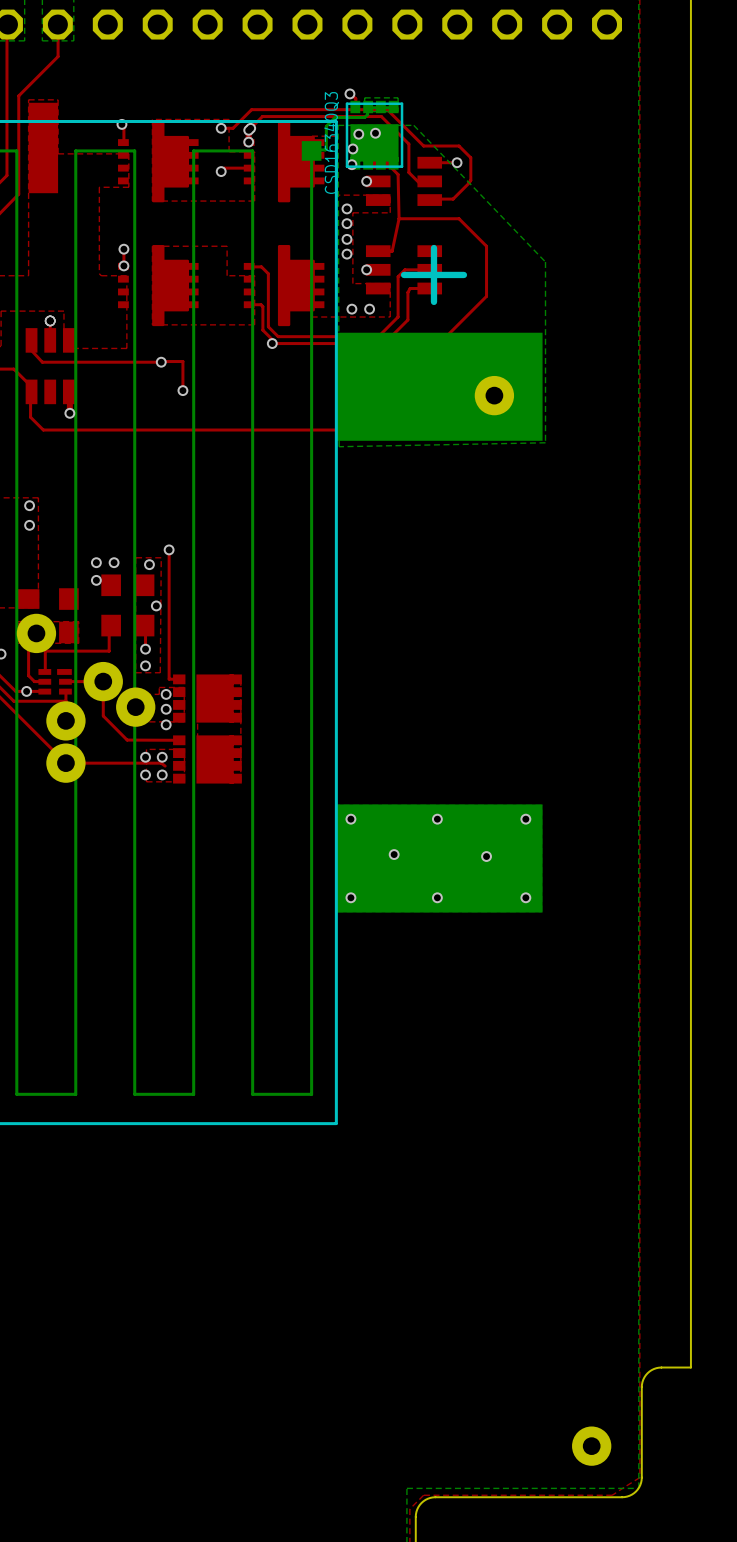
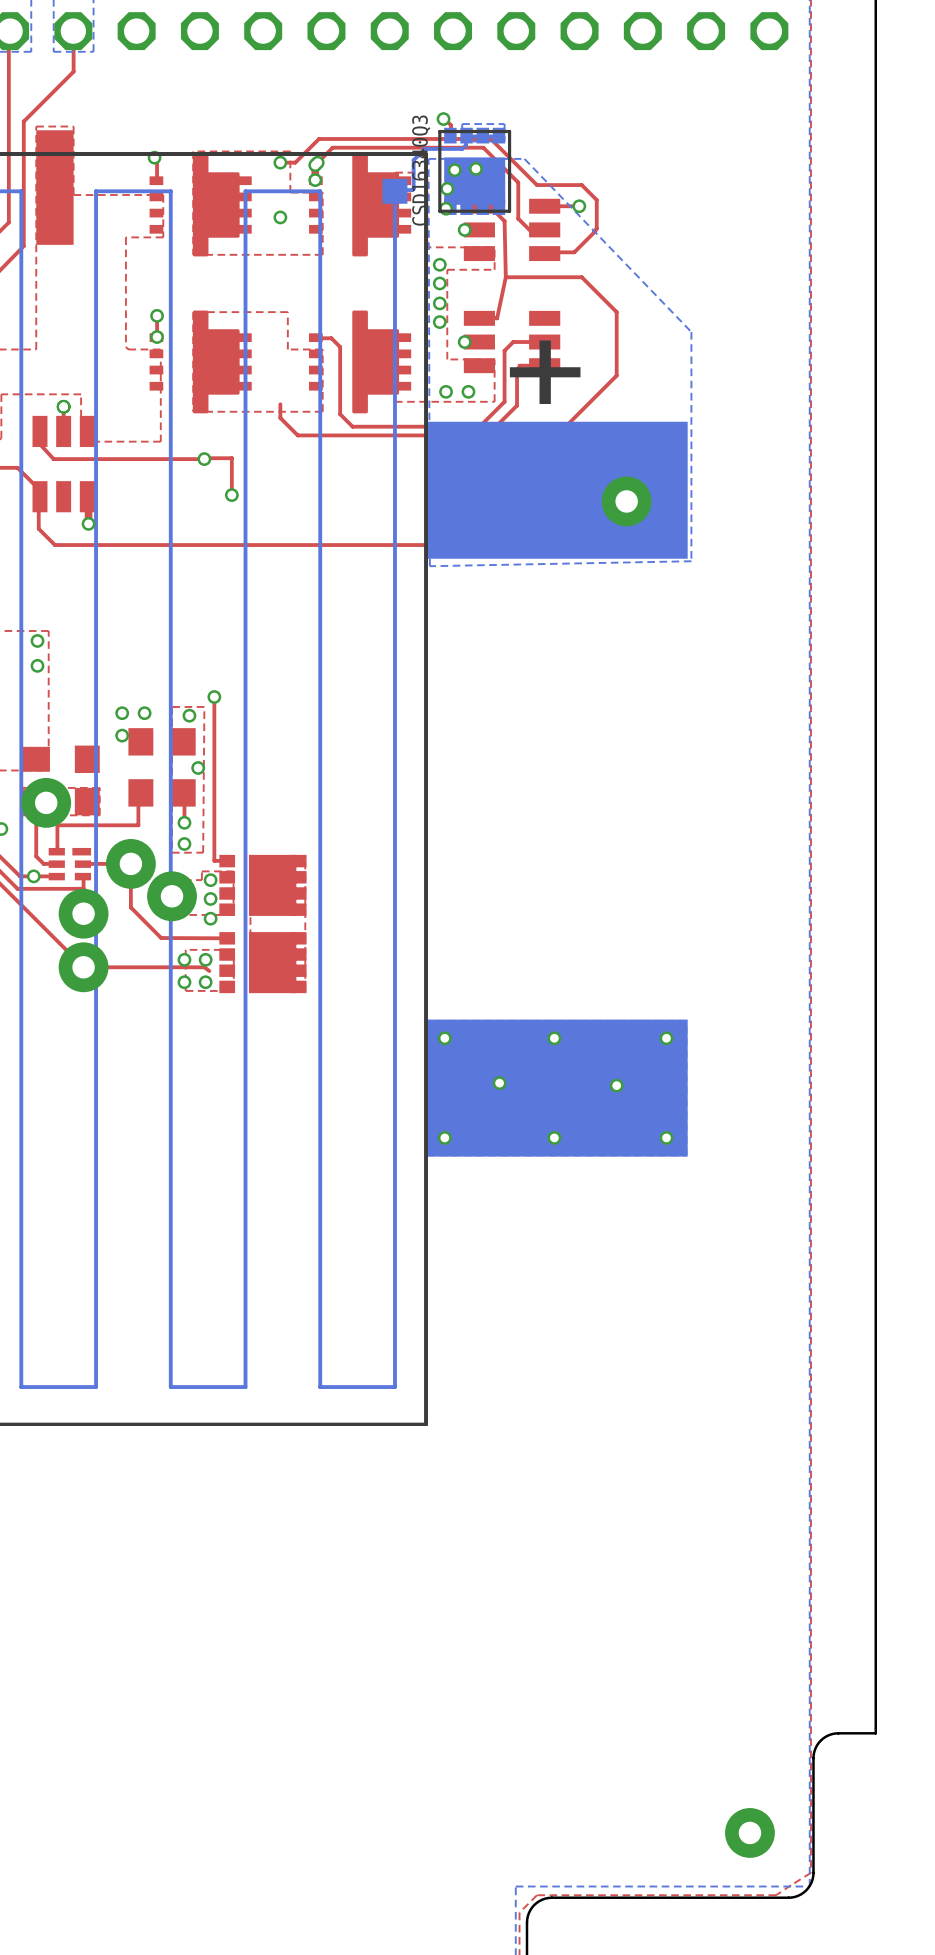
top track: (249, 168) (224, 168) (221, 171) -> none
top track: (249, 304) (261, 304) (262, 306) (262, 330) (276, 343) -> none
top track: none -> (280, 404) (280, 417) (297, 435) (345, 435)
via: (272, 343) -> none

